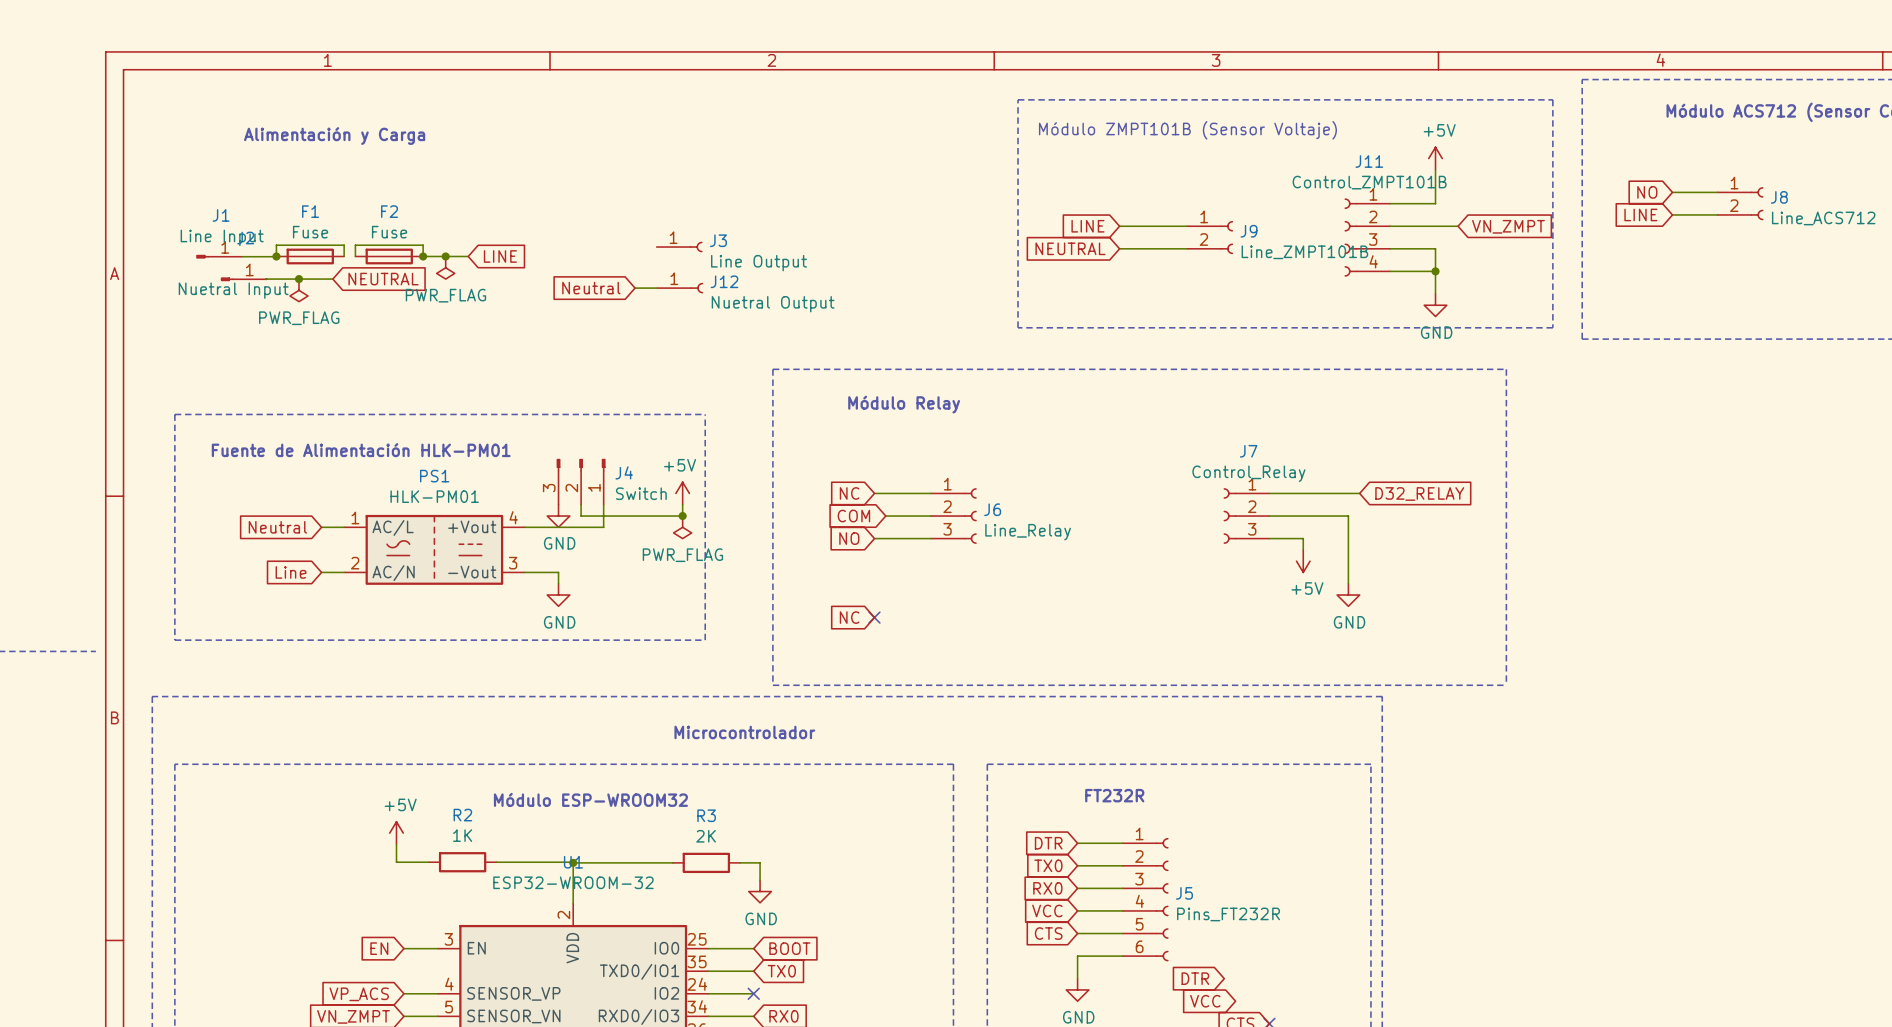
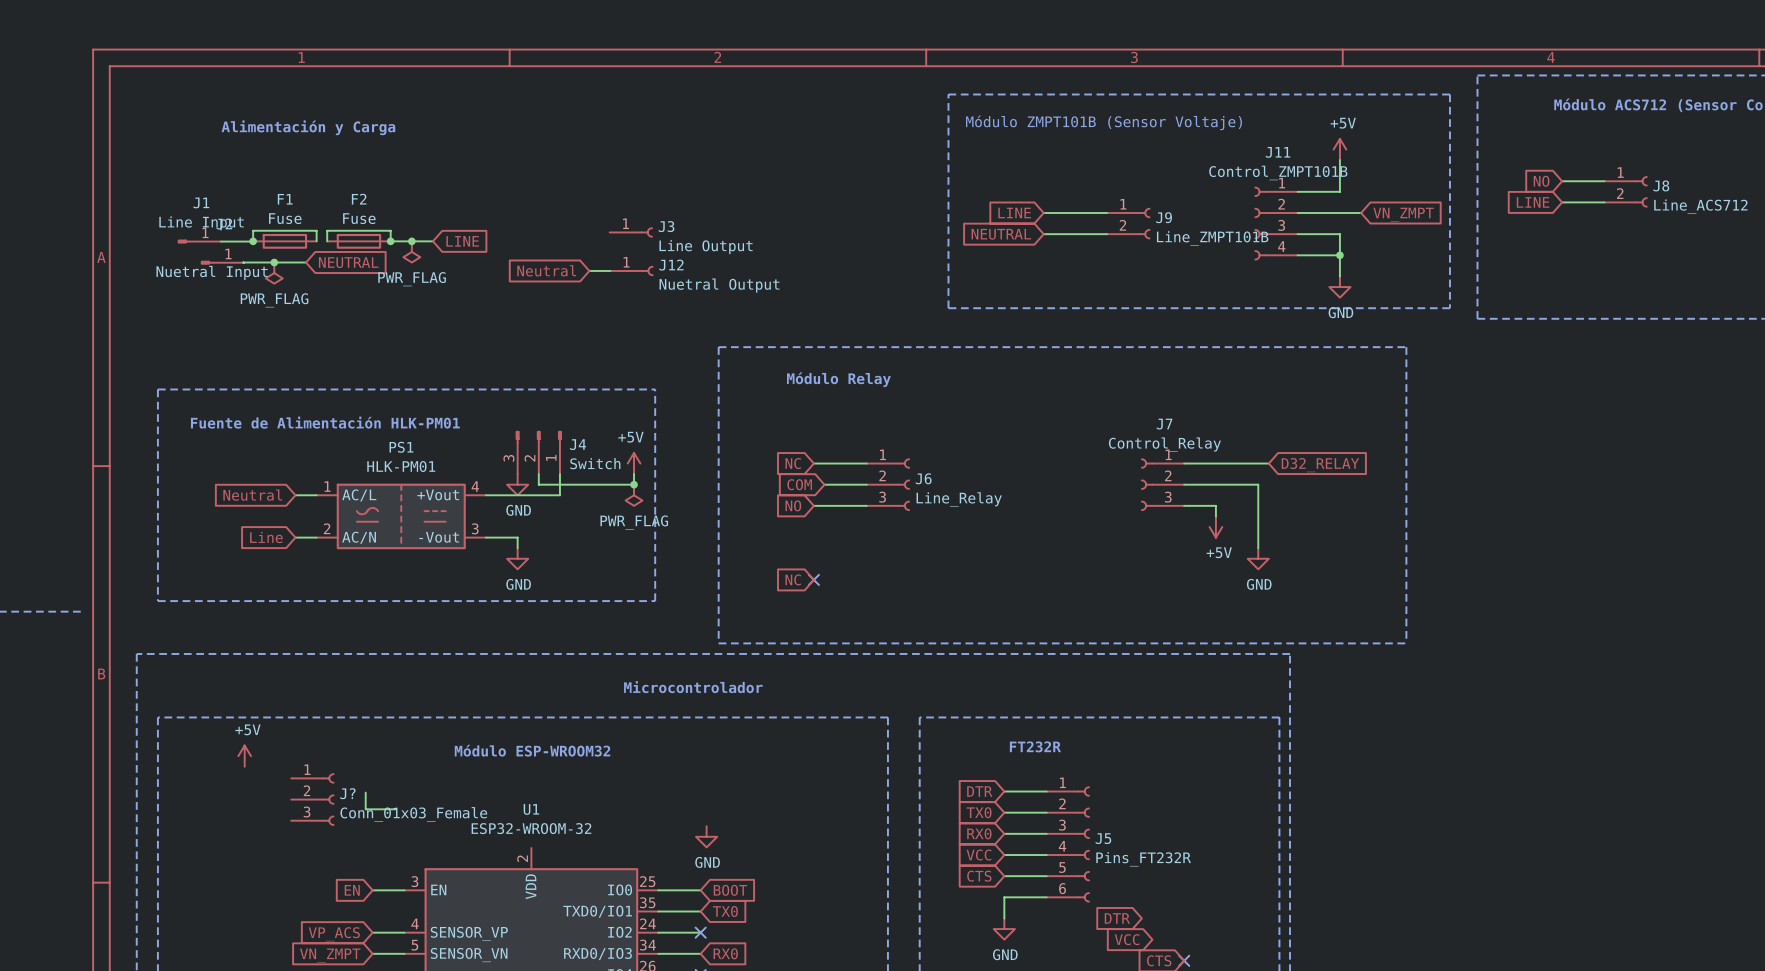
power symbol position: +5V (396, 833) -> +5V (244, 756)
J?: none -> Conn_01x03_Female (312, 799)
R2: 1K (462, 862) -> none
wire: (496, 862) (573, 862) (573, 903) -> none
wire: (573, 862) (672, 862) -> none
junction: (573, 862) -> none
R3: 2K (706, 862) -> none
wire: (740, 862) (760, 862) (760, 880) -> none

